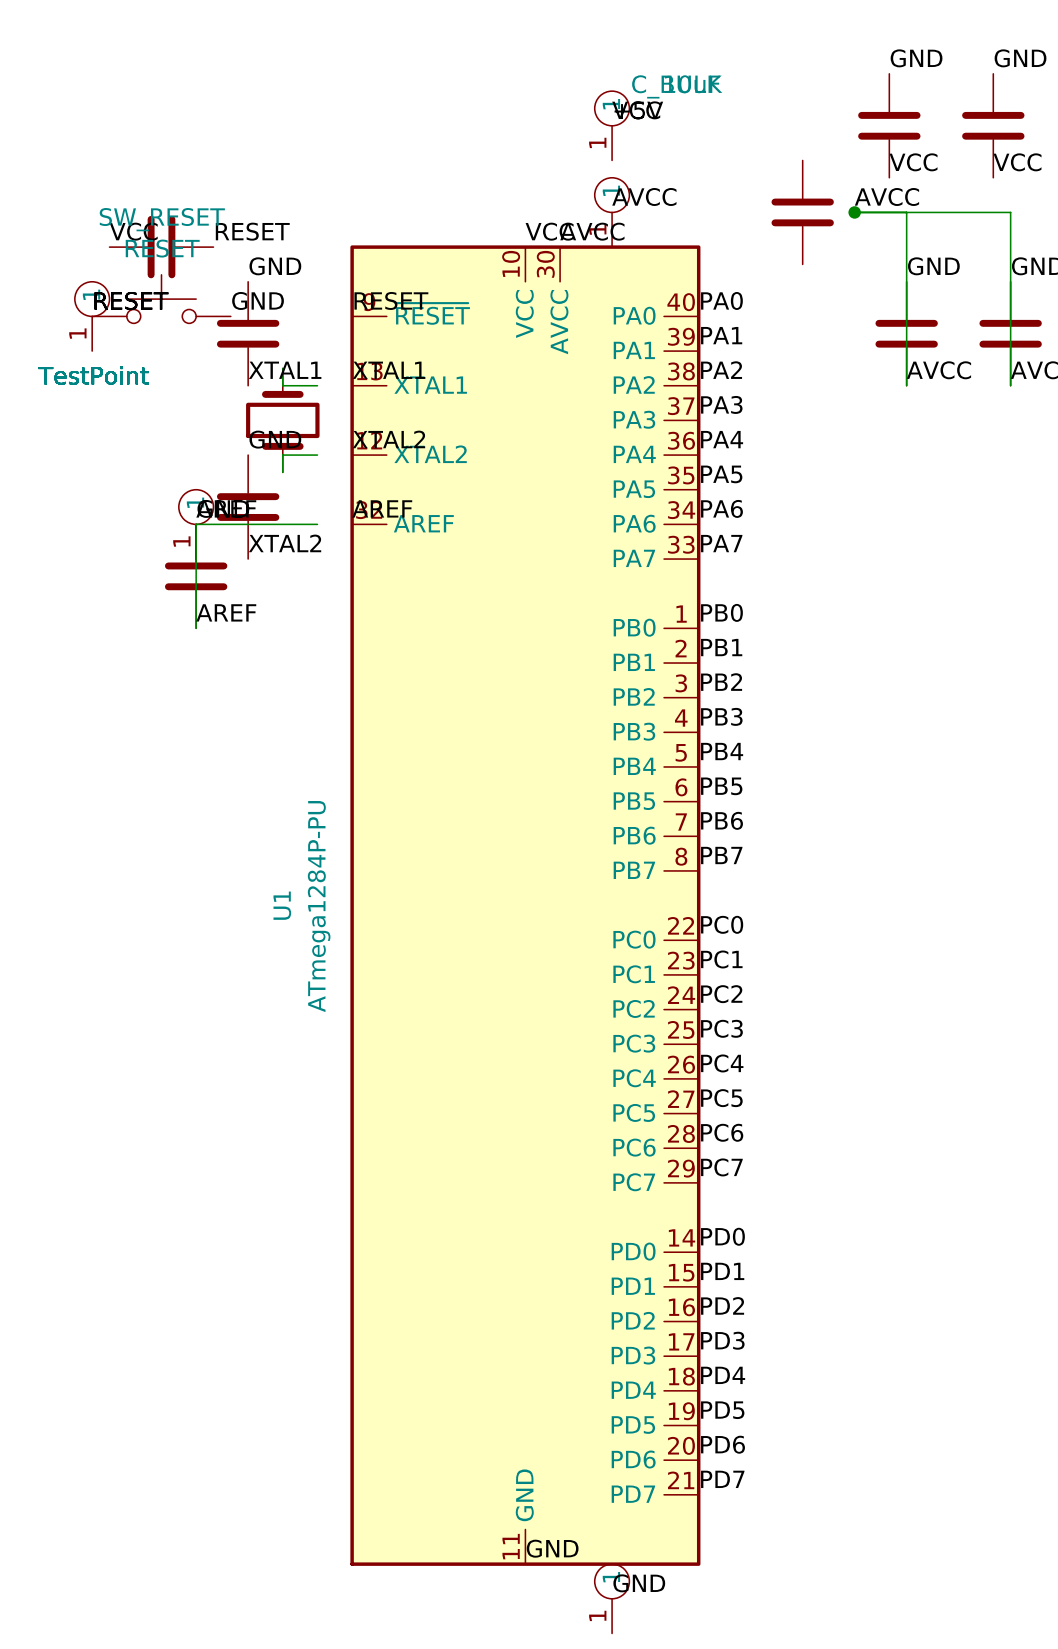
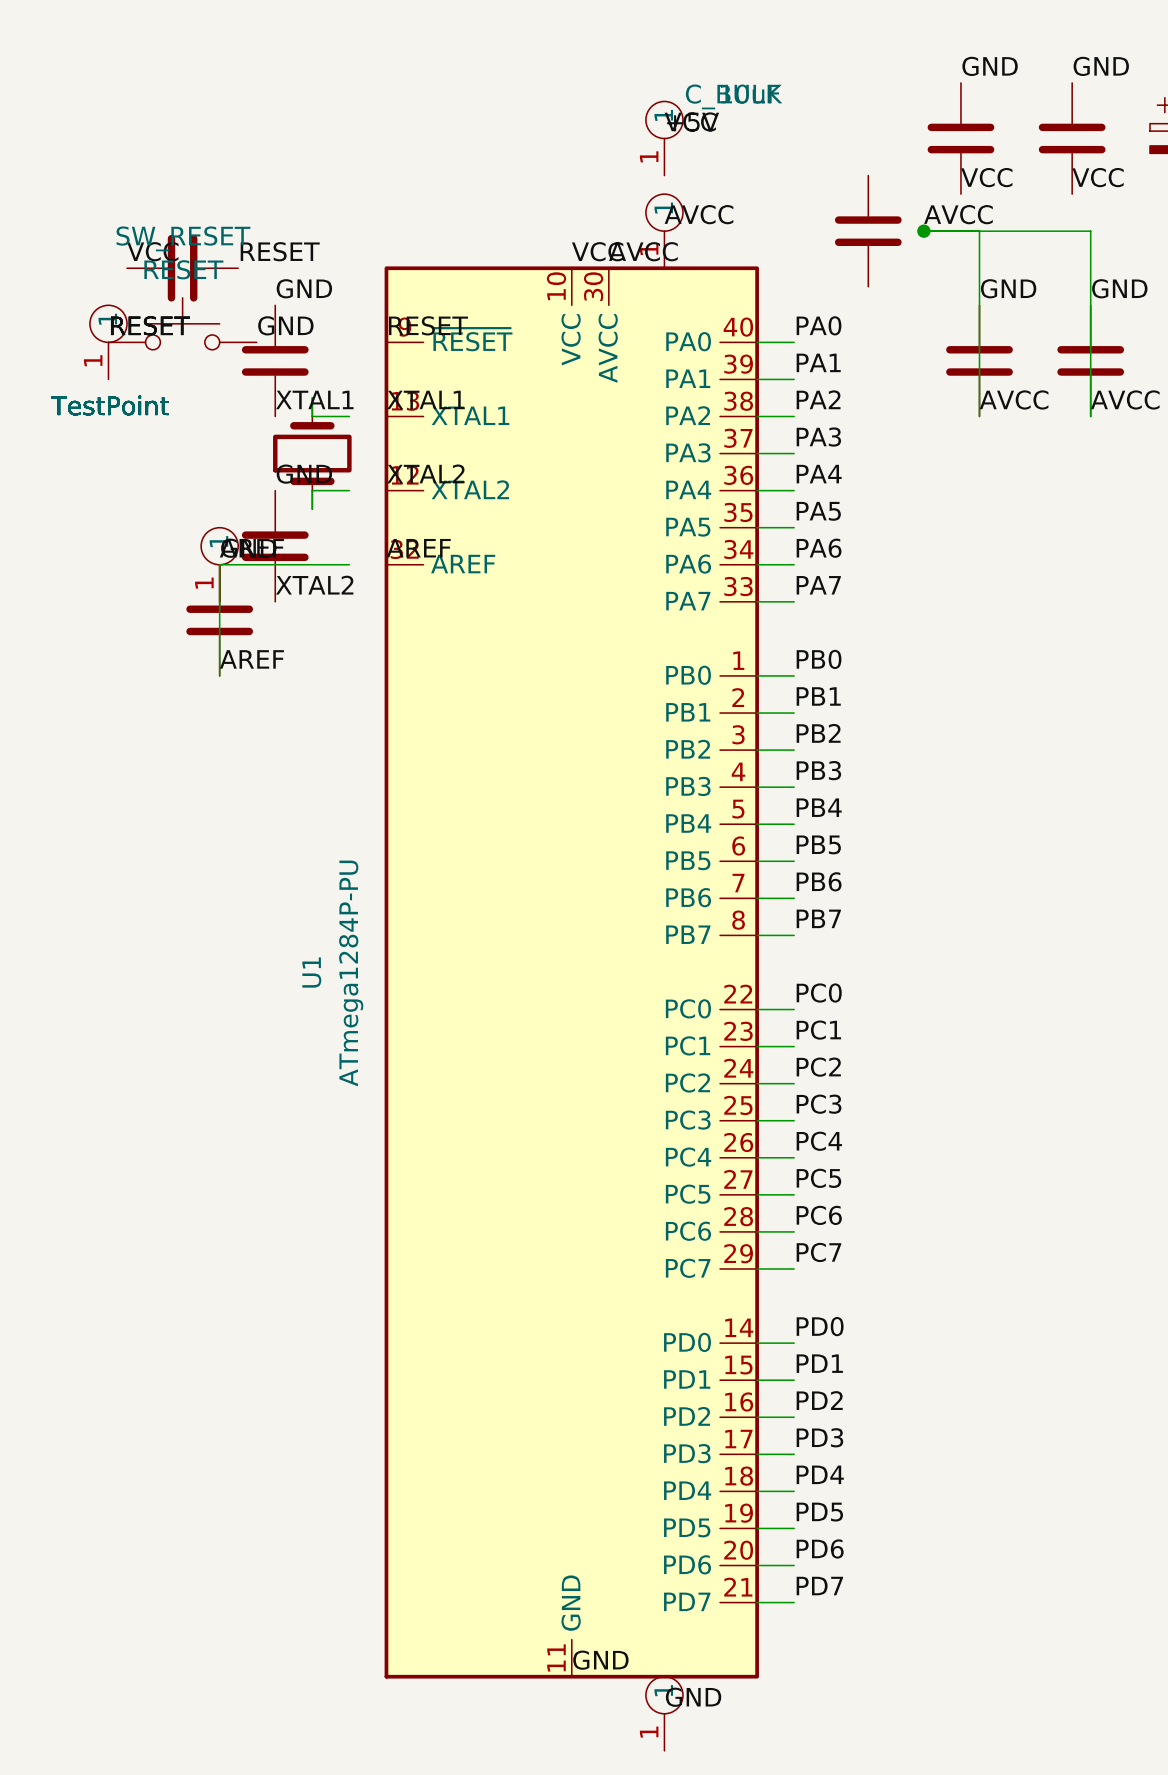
label position: PA0 (721, 300) -> PA0 (819, 325)
wire: none -> (757, 342) (794, 342)
label position: PA1 (721, 335) -> PA1 (818, 362)
wire: none -> (757, 379) (794, 379)
label position: PA2 (721, 370) -> PA2 (818, 399)
wire: none -> (757, 416) (794, 416)
label position: PA3 (721, 404) -> PA3 (818, 437)
wire: none -> (757, 453) (794, 453)
label position: PA4 (722, 439) -> PA4 (819, 474)
wire: none -> (757, 490) (794, 490)
label position: PA5 (721, 474) -> PA5 (818, 511)
wire: none -> (757, 527) (794, 527)
label position: PA6 (721, 508) -> PA6 (819, 548)
wire: none -> (757, 564) (794, 564)
label position: PA7 (721, 543) -> PA7 (818, 585)
wire: none -> (757, 601) (794, 601)
label position: PB0 (721, 612) -> PB0 (819, 659)
wire: none -> (757, 675) (794, 675)
label position: PB1 (721, 647) -> PB1 (818, 696)
wire: none -> (757, 713) (794, 713)
label position: PB2 (721, 682) -> PB2 (818, 733)
wire: none -> (757, 750) (794, 750)
label position: PB3 (721, 716) -> PB3 (818, 770)
wire: none -> (757, 787) (794, 787)
label position: PB4 (722, 751) -> PB4 (819, 807)
wire: none -> (757, 824) (794, 824)
label position: PB5 (721, 786) -> PB5 (818, 844)
wire: none -> (757, 861) (794, 861)
label position: PB6 (722, 820) -> PB6 (819, 881)
wire: none -> (757, 898) (794, 898)
label position: PB7 (721, 855) -> PB7 (818, 918)
wire: none -> (757, 935) (794, 935)
label position: PC0 (722, 924) -> PC0 (819, 993)
wire: none -> (757, 1009) (794, 1009)
label position: PC1 (721, 959) -> PC1 (818, 1030)
wire: none -> (757, 1046) (794, 1046)
label position: PC2 (721, 994) -> PC2 (818, 1067)
wire: none -> (757, 1083) (794, 1083)
label position: PC3 (721, 1028) -> PC3 (819, 1104)
wire: none -> (757, 1120) (794, 1120)
label position: PC4 (722, 1063) -> PC4 (819, 1141)
wire: none -> (757, 1157) (794, 1157)
label position: PC5 (721, 1098) -> PC5 (818, 1178)
wire: none -> (757, 1194) (794, 1194)
label position: PC6 (722, 1132) -> PC6 (819, 1215)
wire: none -> (757, 1231) (794, 1231)
label position: PC7 (721, 1167) -> PC7 (818, 1252)
wire: none -> (757, 1268) (794, 1268)
label position: PD0 (722, 1236) -> PD0 (820, 1326)
wire: none -> (757, 1343) (794, 1343)
label position: PD1 (722, 1271) -> PD1 (819, 1363)
wire: none -> (757, 1380) (794, 1380)
label position: PD2 (722, 1305) -> PD2 (819, 1400)
wire: none -> (757, 1417) (794, 1417)
label position: PD3 (722, 1340) -> PD3 (819, 1437)
wire: none -> (757, 1454) (794, 1454)
label position: PD4 (723, 1375) -> PD4 (820, 1474)
wire: none -> (757, 1491) (794, 1491)
label position: PD5 (722, 1410) -> PD5 (819, 1512)
wire: none -> (757, 1528) (794, 1528)
label position: PD6 (723, 1444) -> PD6 (820, 1548)
wire: none -> (757, 1565) (794, 1565)
label position: PD7 (722, 1479) -> PD7 (819, 1586)
wire: none -> (757, 1602) (794, 1602)

